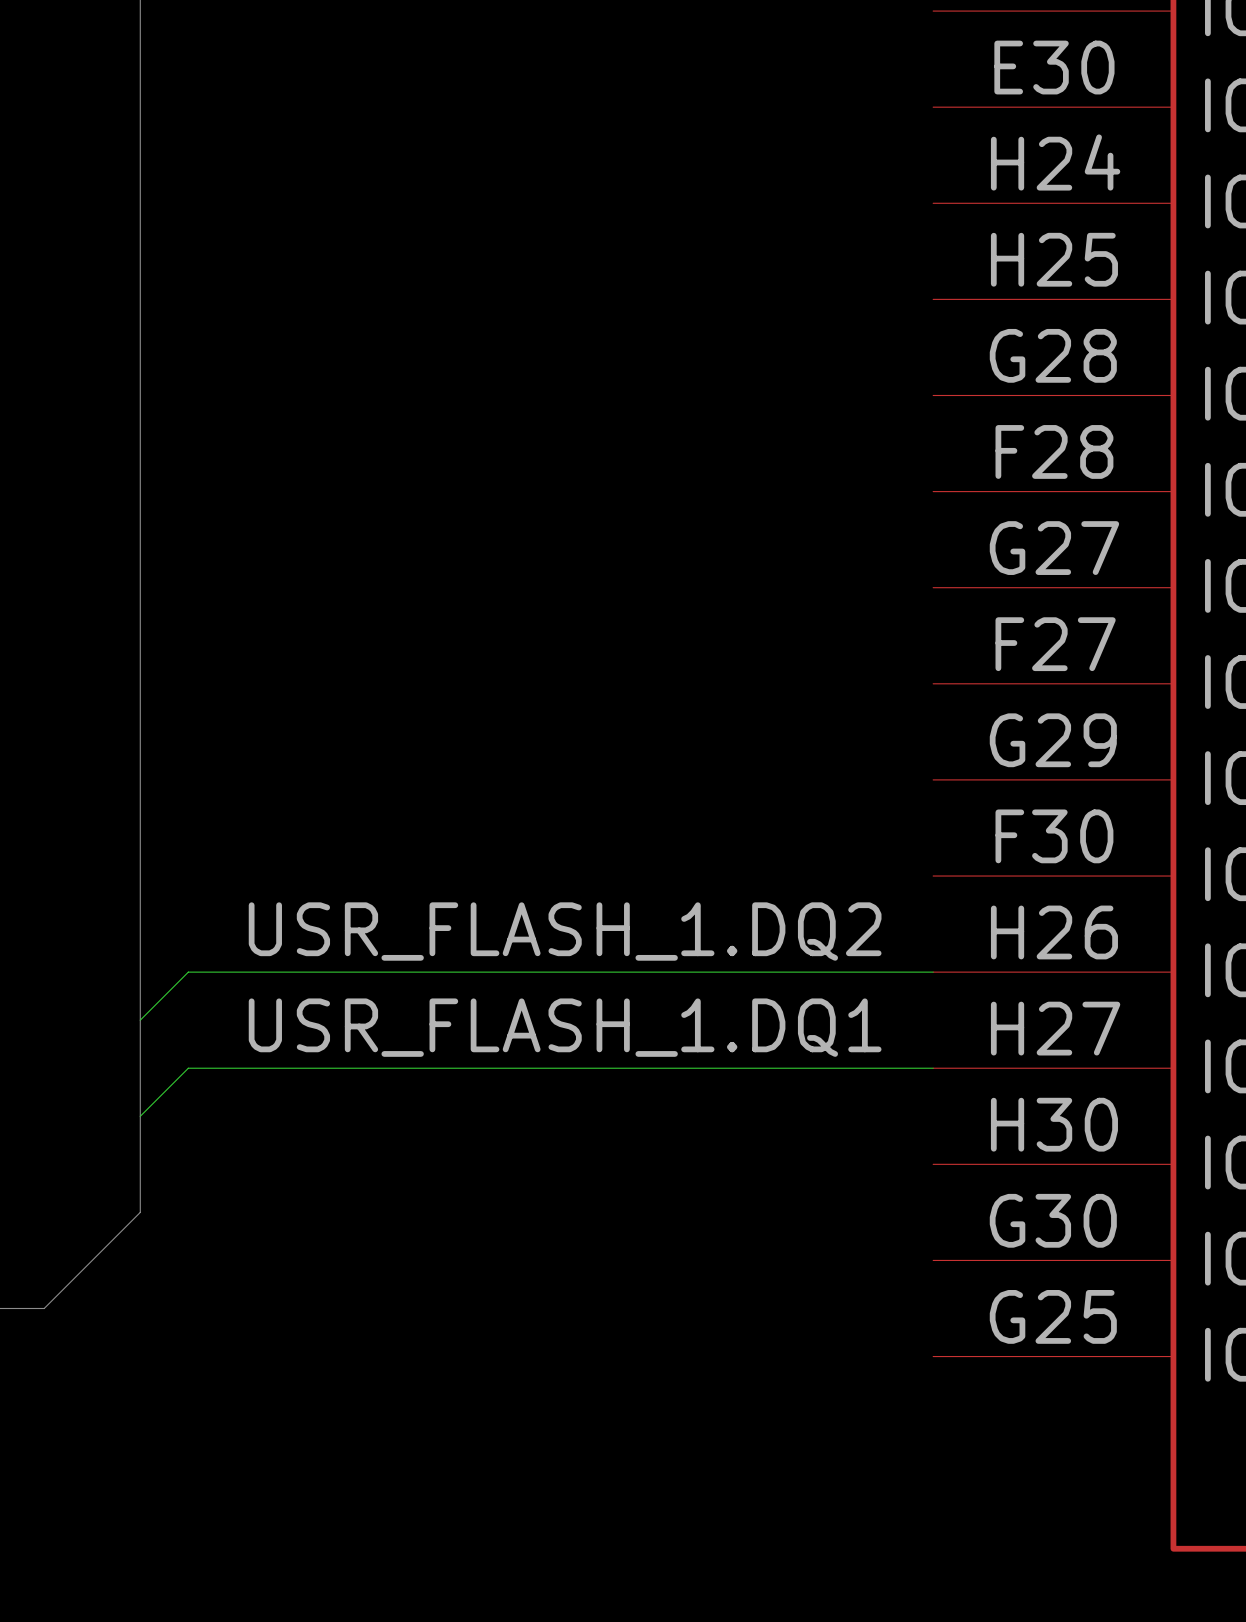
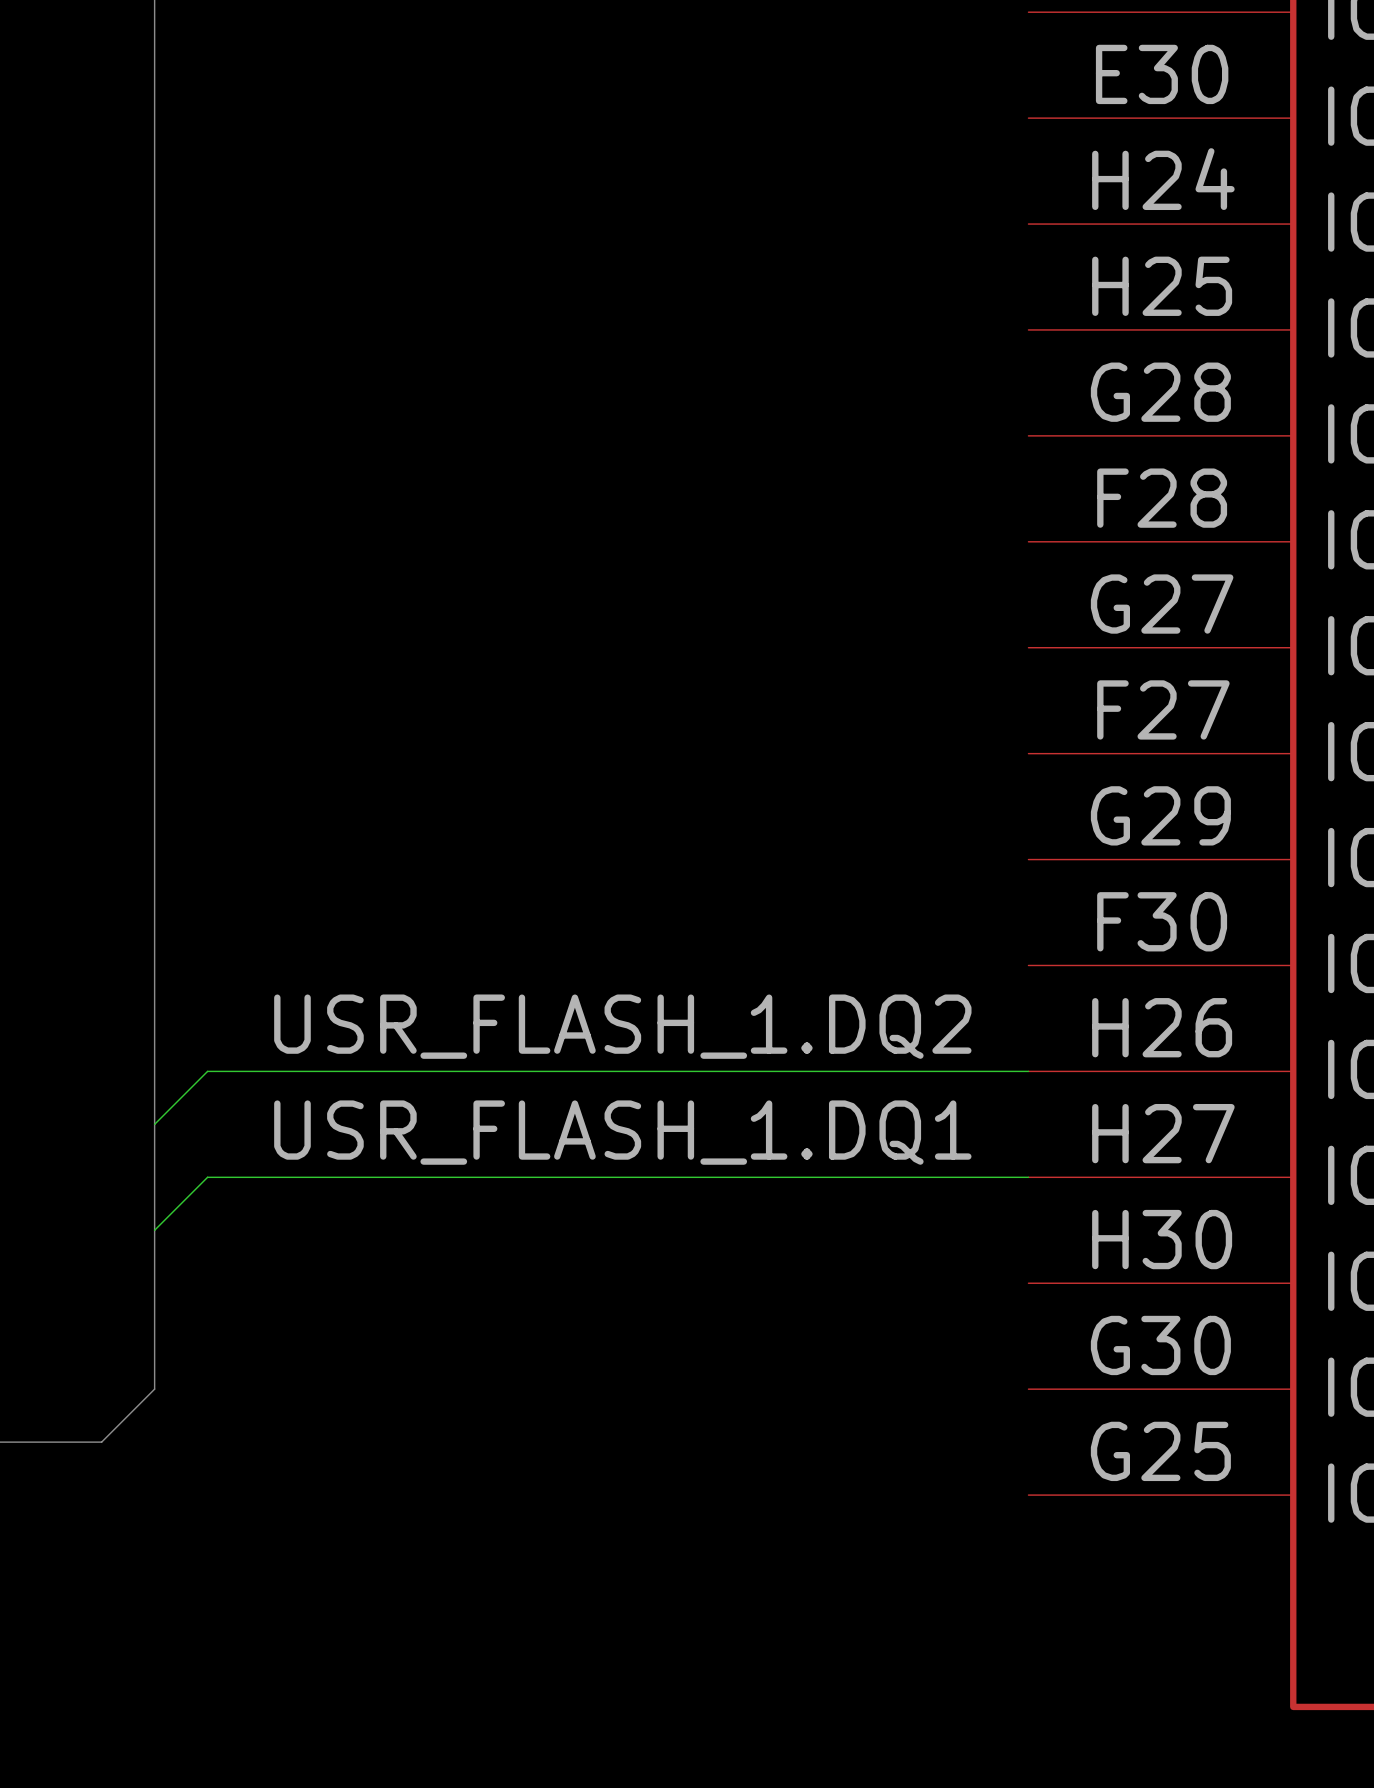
bus: (140, 1212) (44, 1308) -> (154, 1336) (154, 1389) (101, 1442) (48, 1442)

